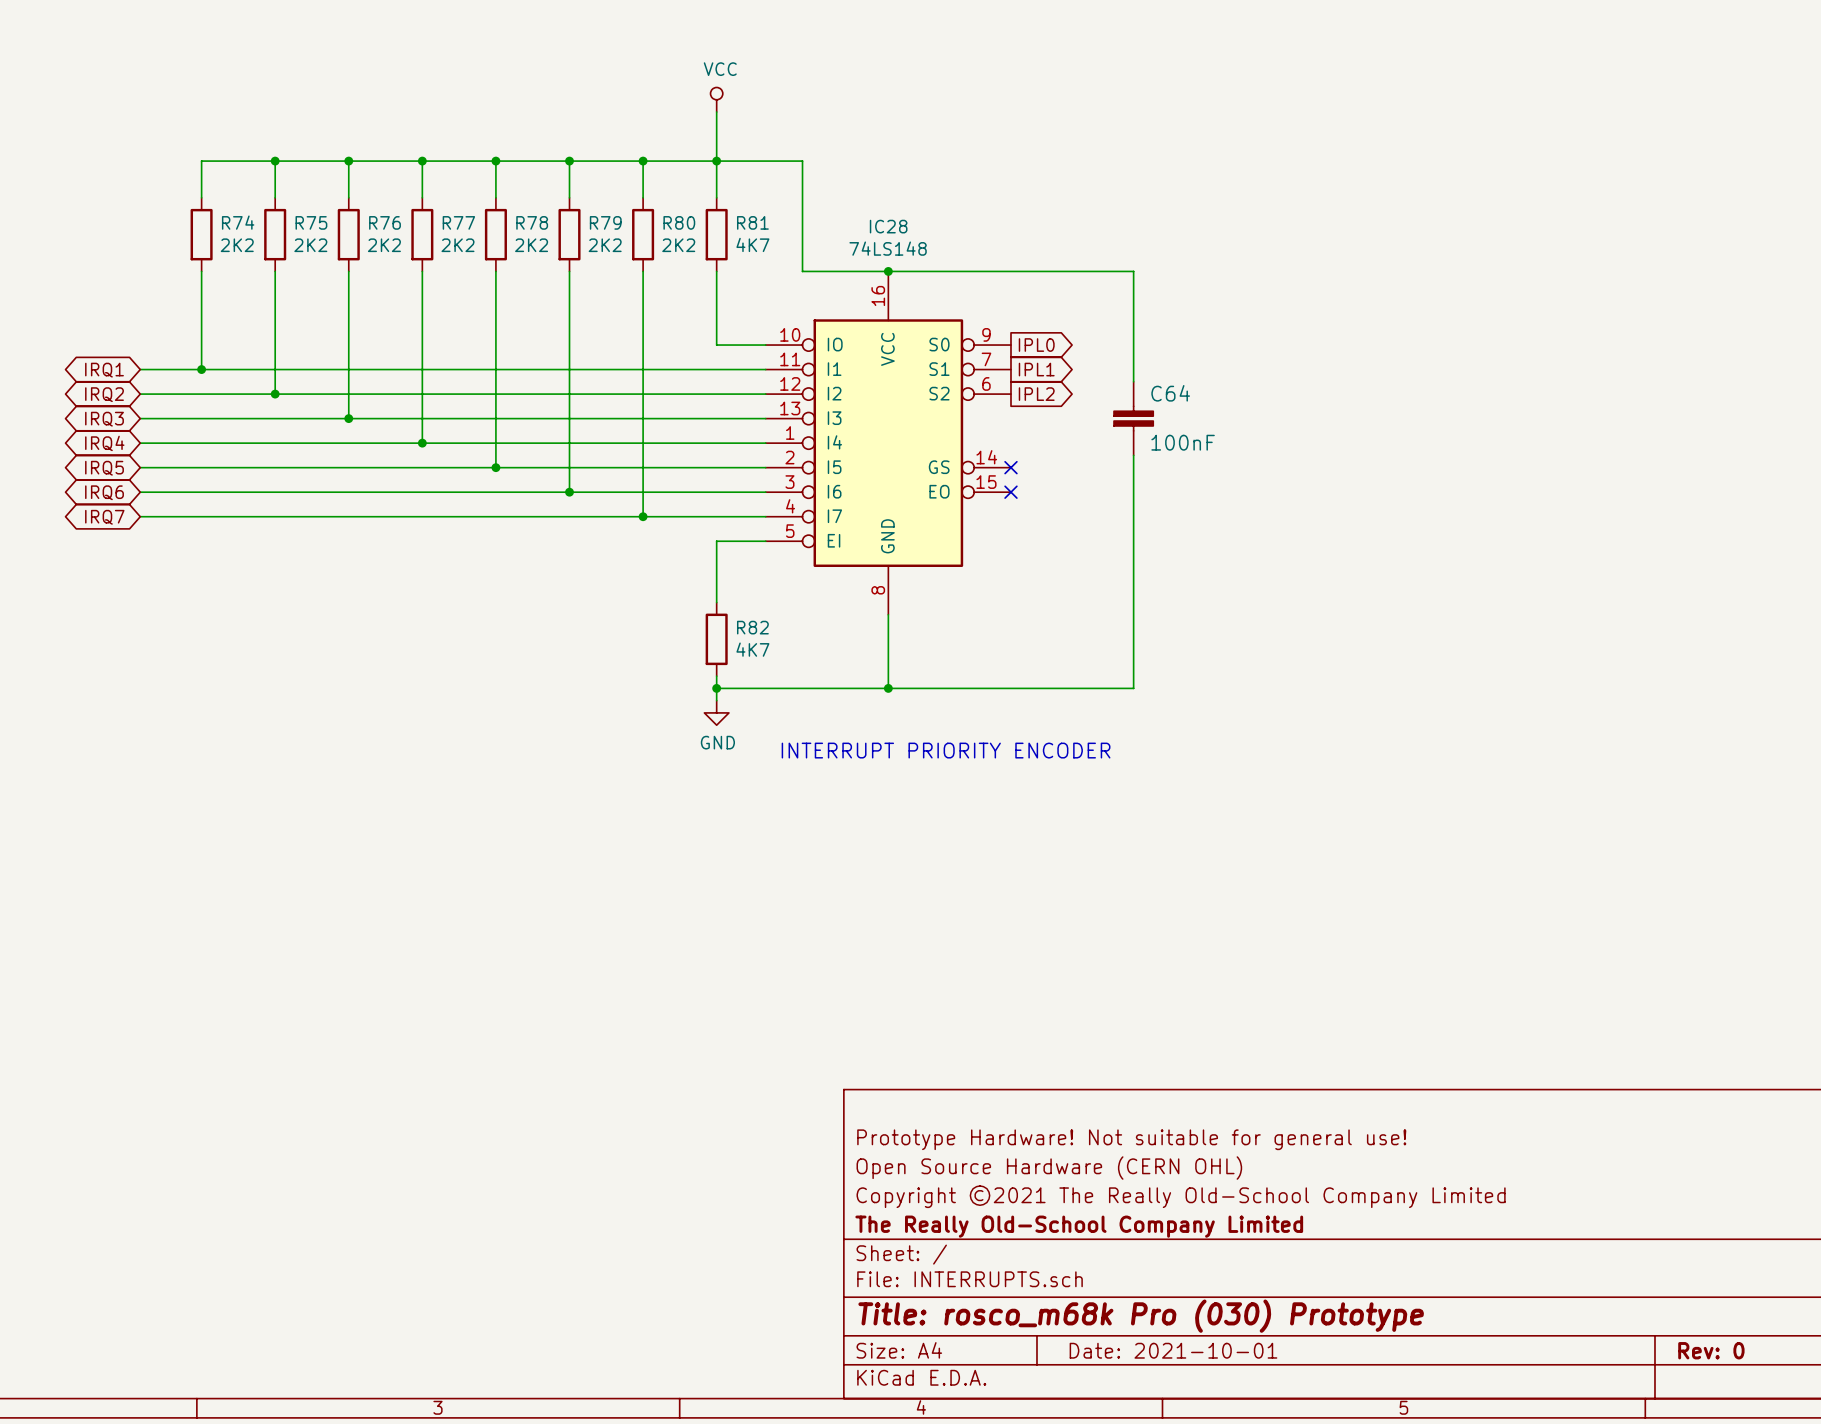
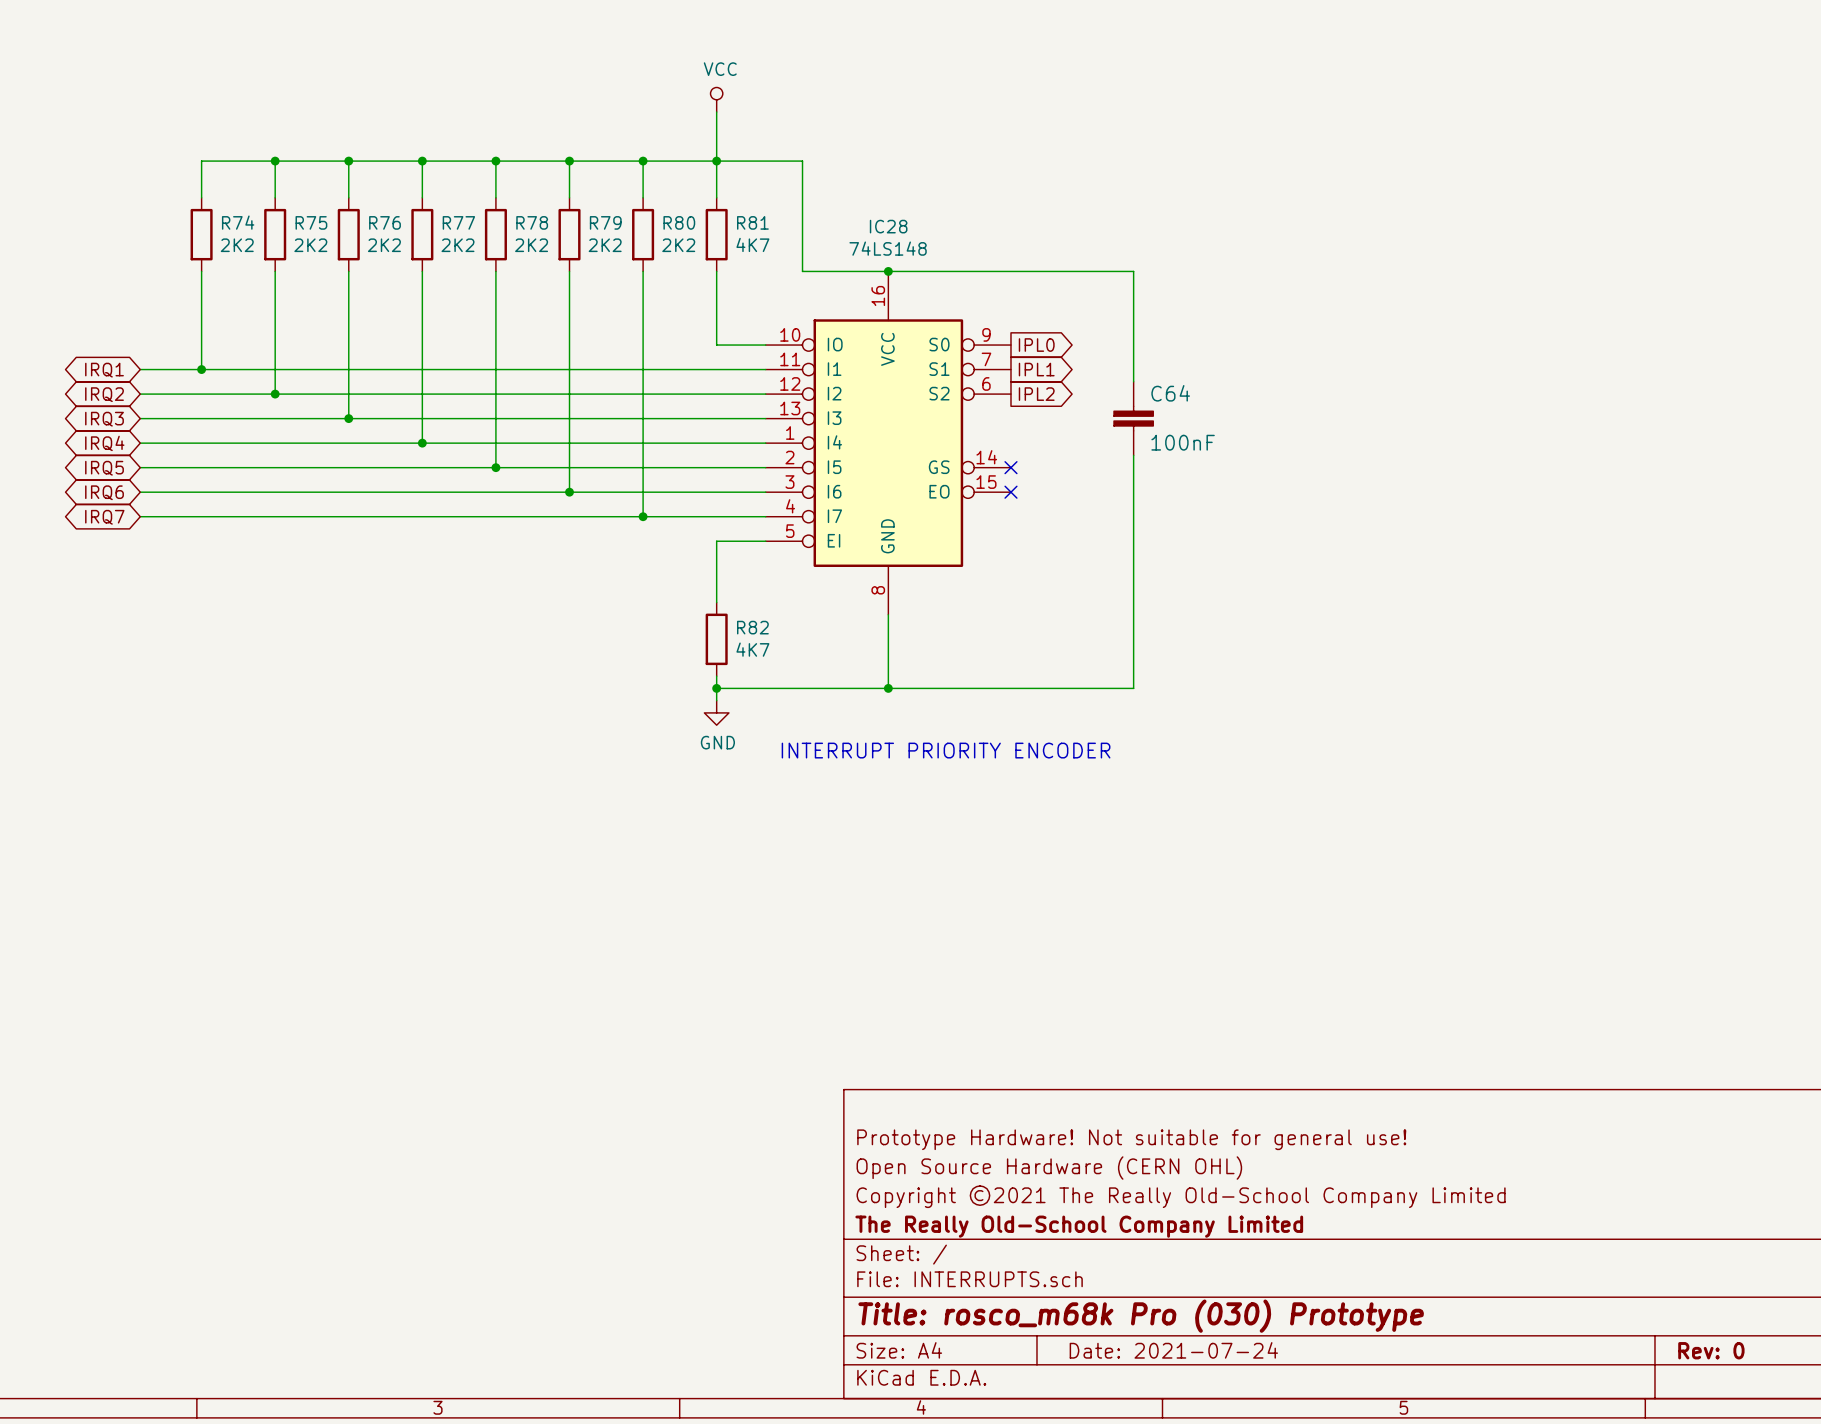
title block: Date: 2021-10-01 (1173, 1350) -> Date: 2021-07-24 (1173, 1350)

